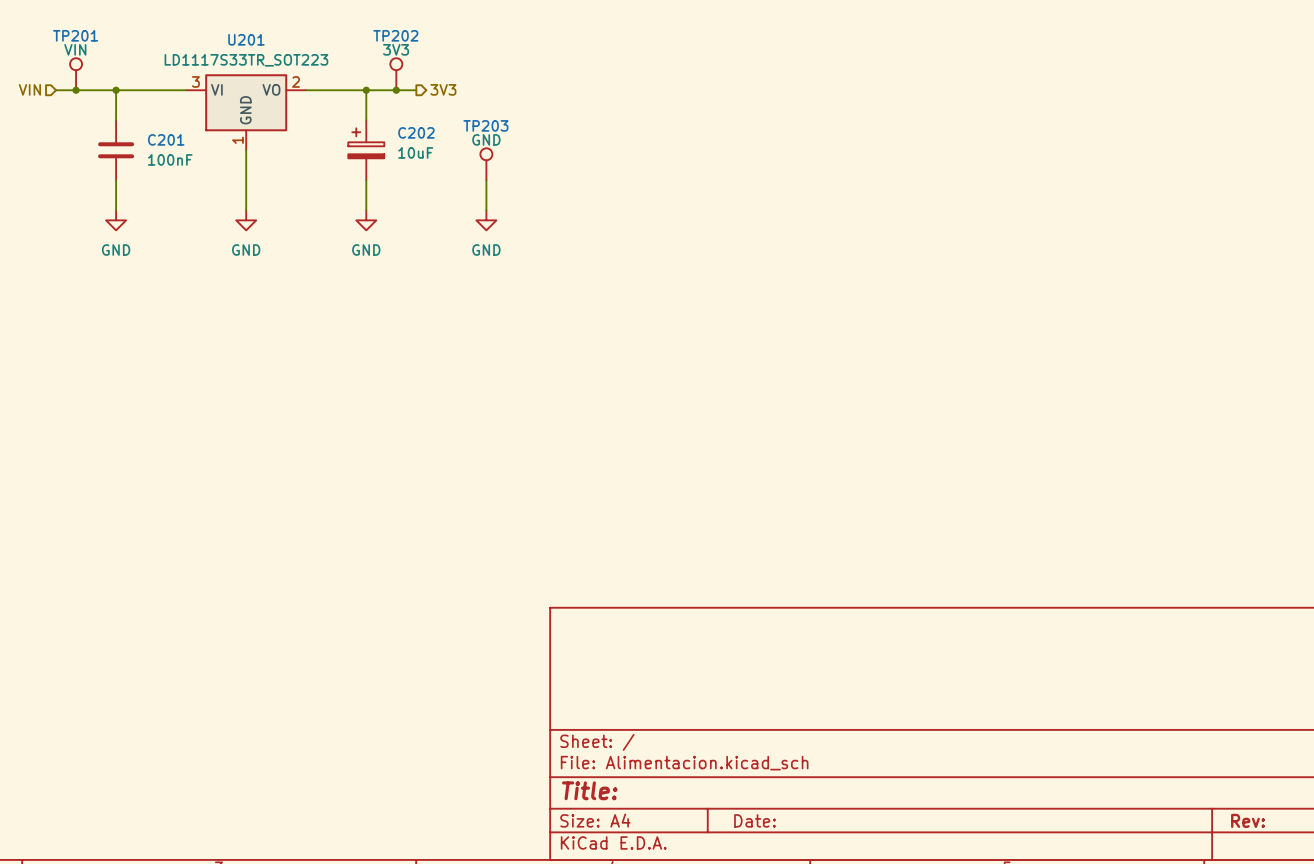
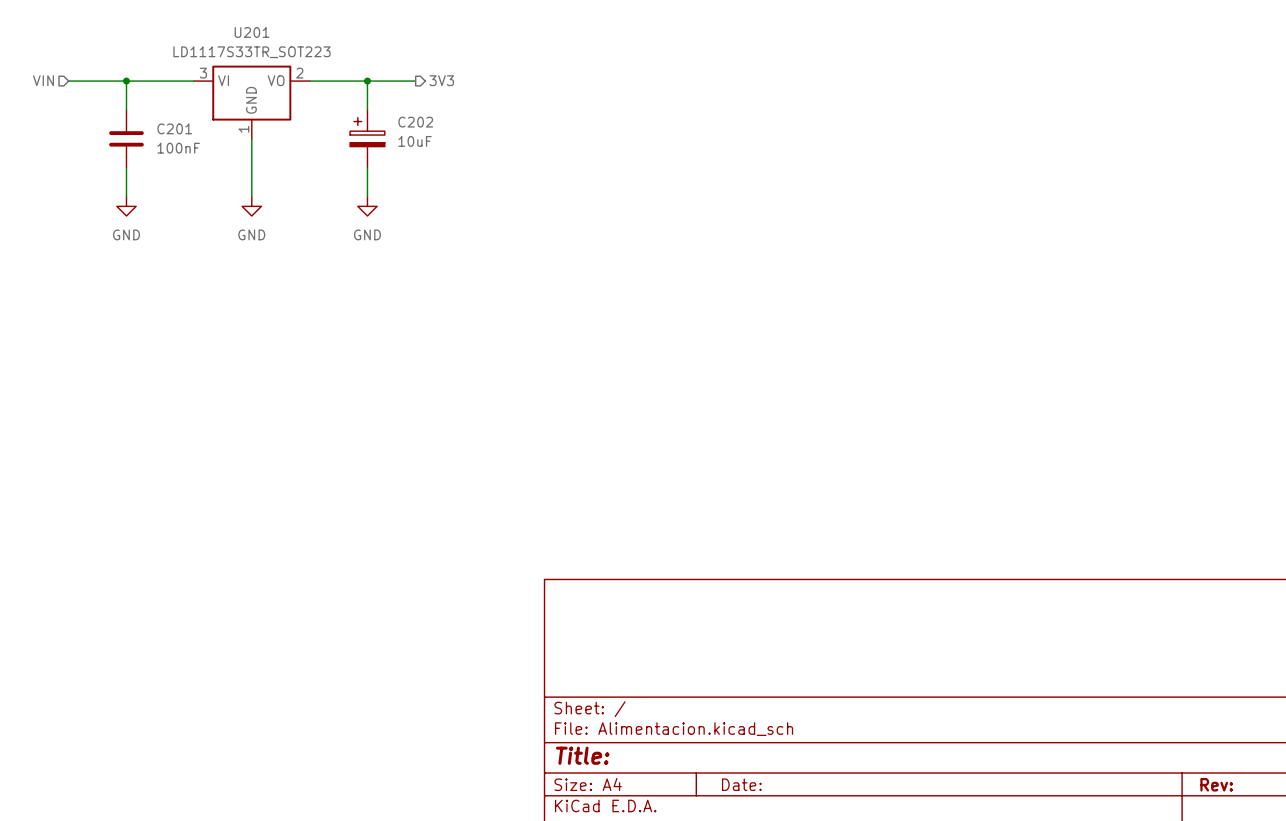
TP201: VIN (76, 74) -> none
TP202: 3V3 (396, 74) -> none
junction: (76, 90) -> none
junction: (396, 90) -> none
TP203: GND (486, 164) -> none
wire: (486, 180) (486, 210) -> none
power symbol: GND (486, 220) -> none

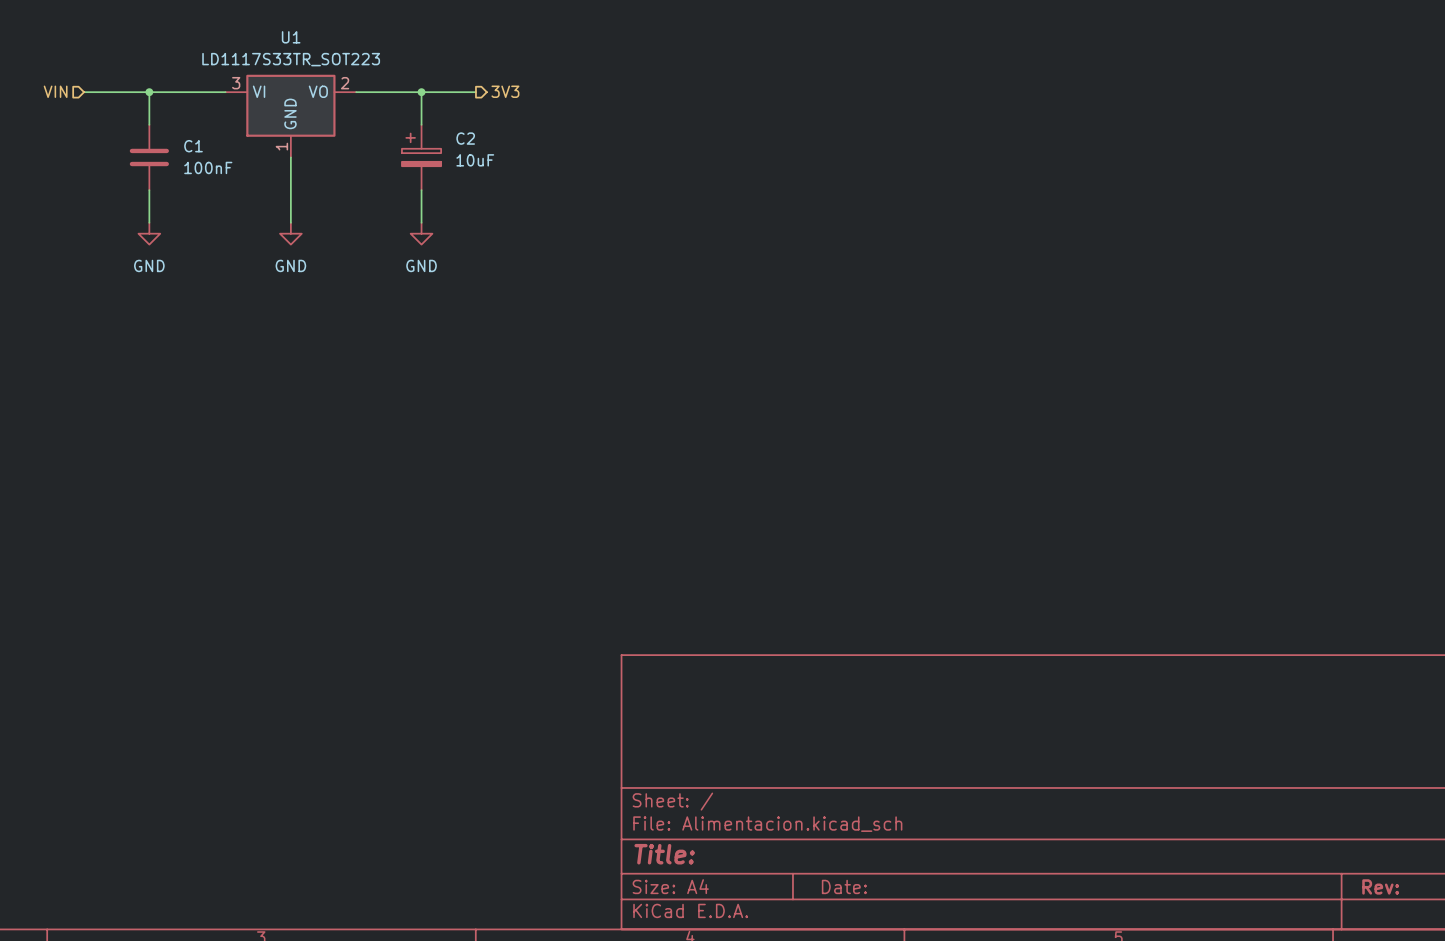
U201 name: U201 (252, 32) -> U1 (291, 37)
C202 name: C202 (415, 122) -> C2 (465, 138)
C201 name: C201 (174, 128) -> C1 (193, 146)

